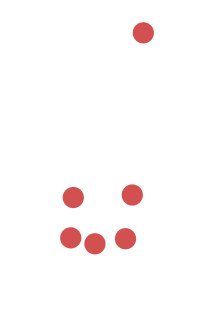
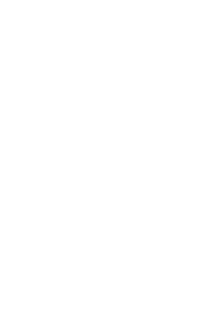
part: (143, 32) -> none
part: (132, 195) -> none
part: (73, 197) -> none
part: (70, 237) -> none
part: (125, 238) -> none
part: (94, 243) -> none

